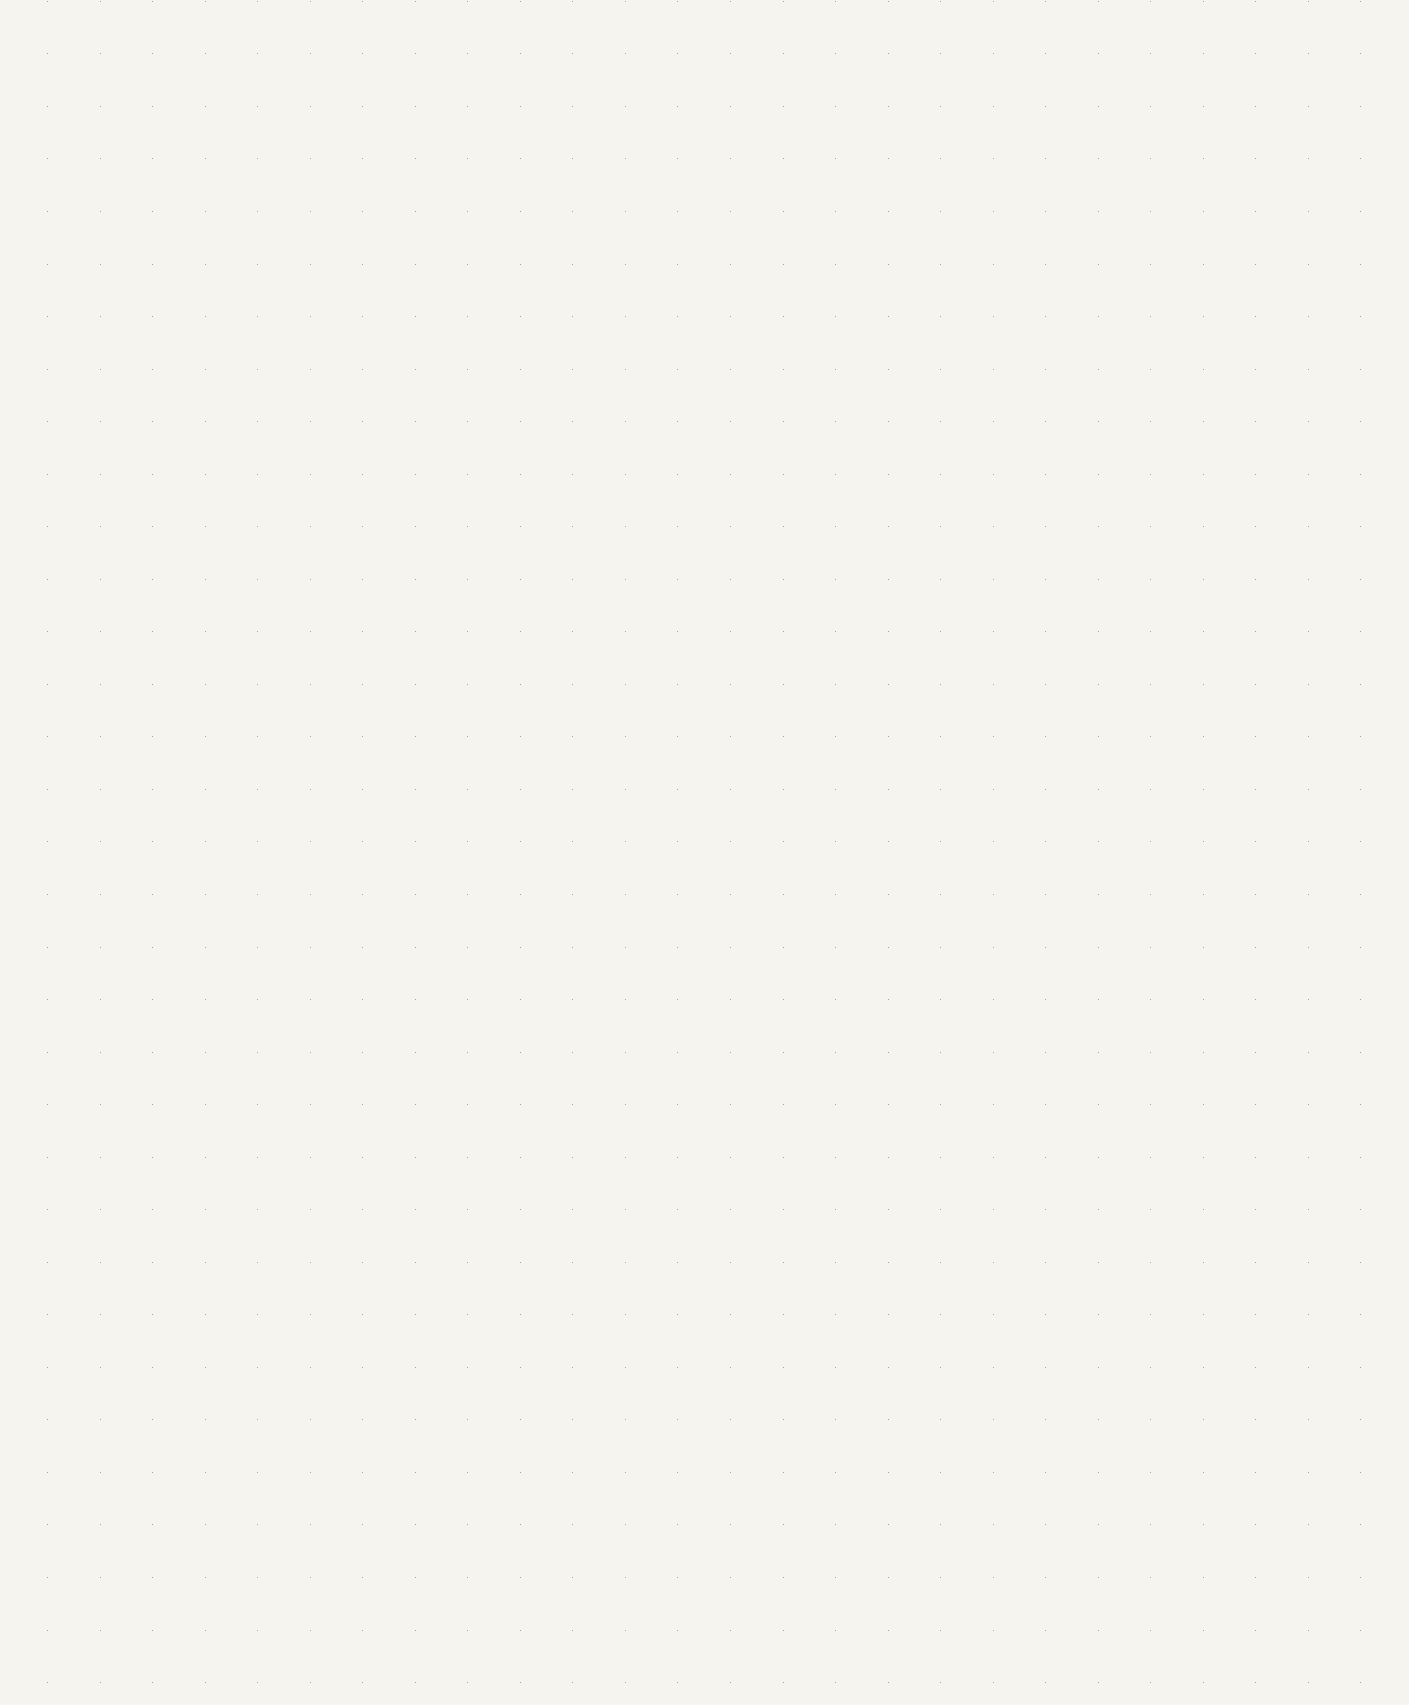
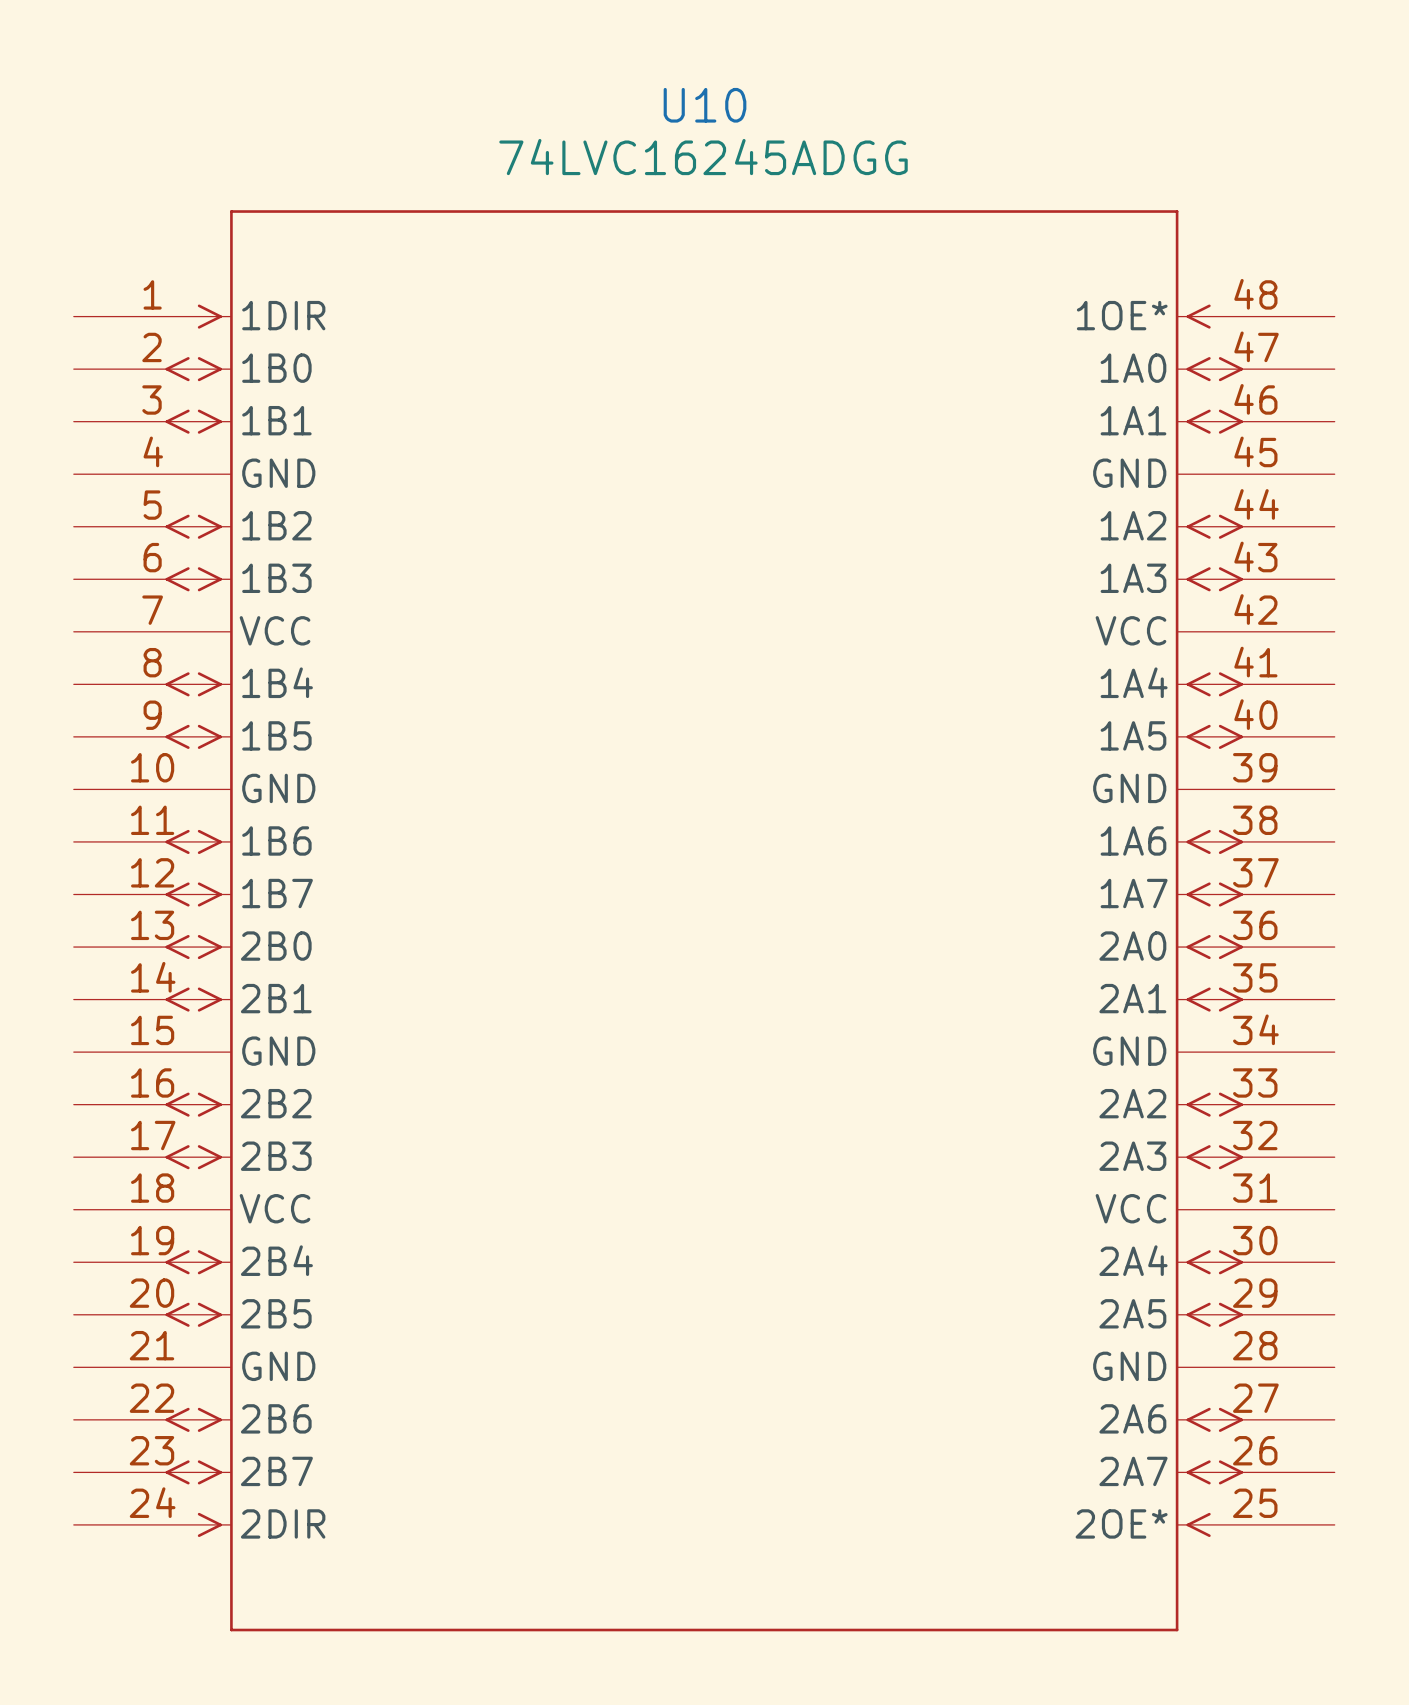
U10: none -> 74LVC16245ADGG (704, 920)

